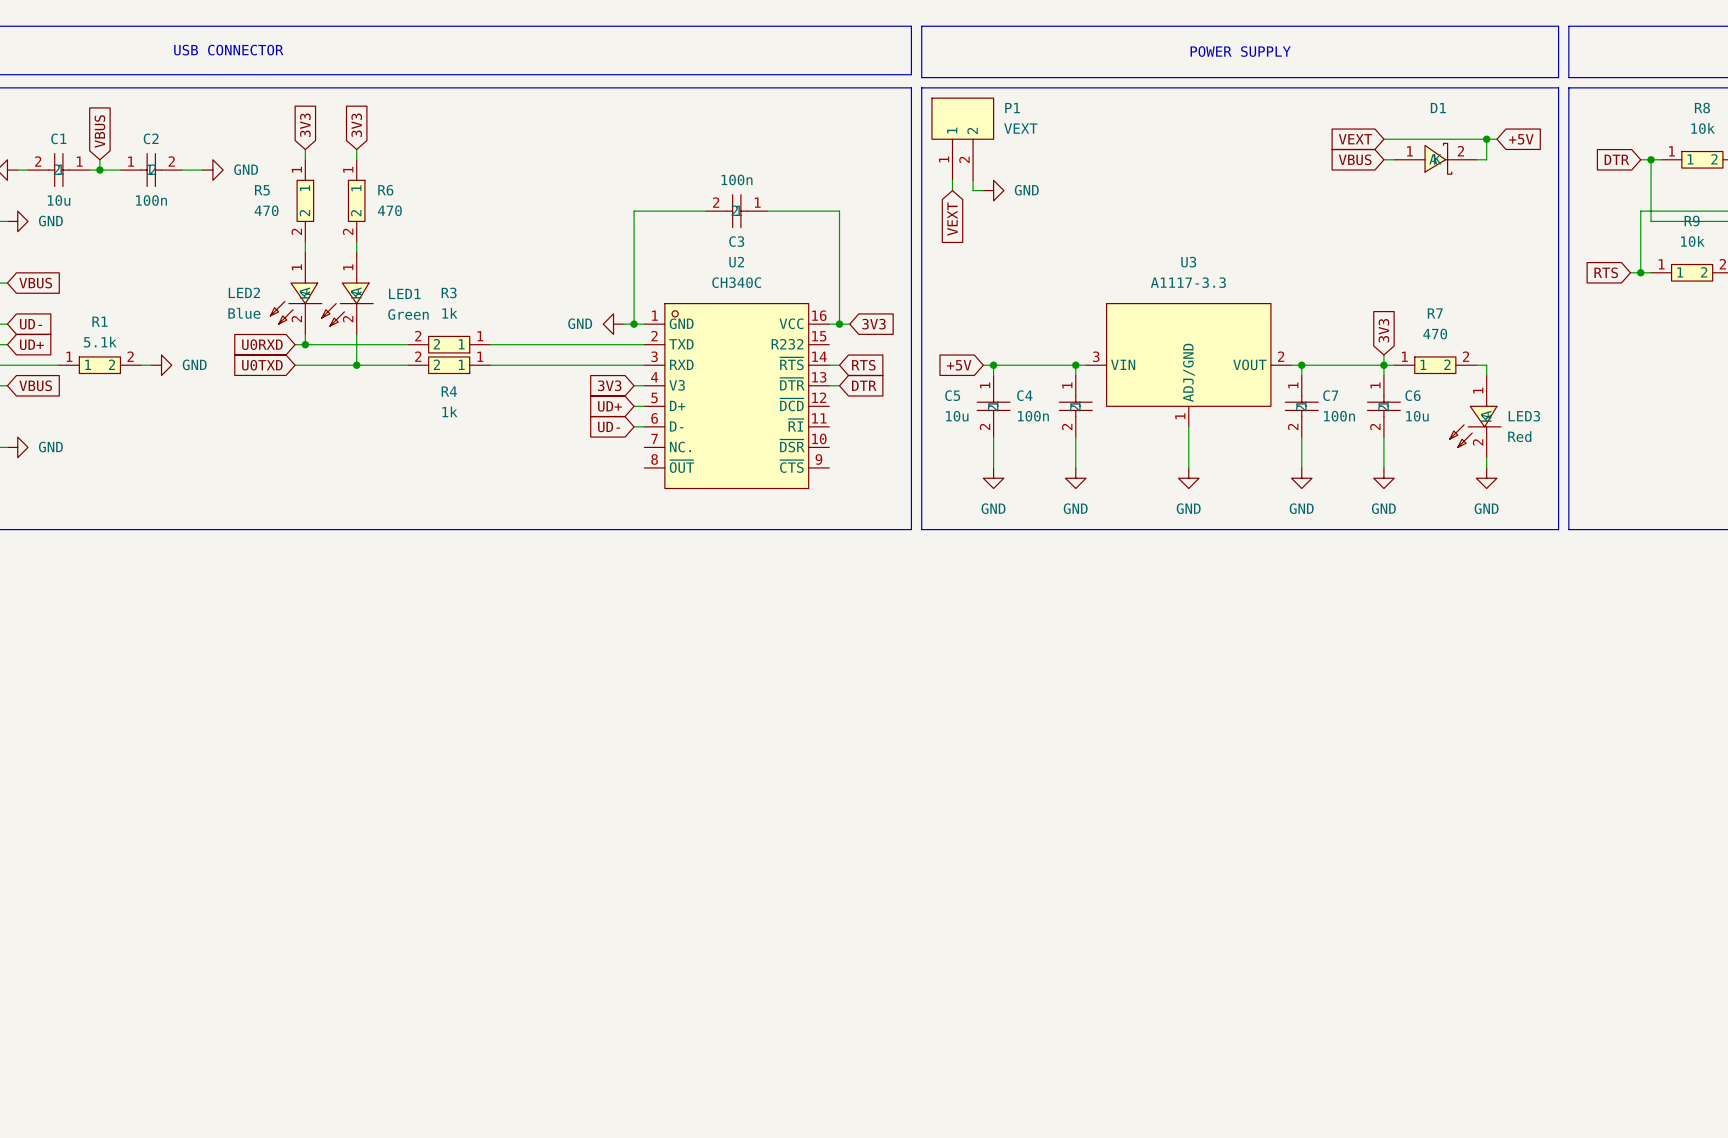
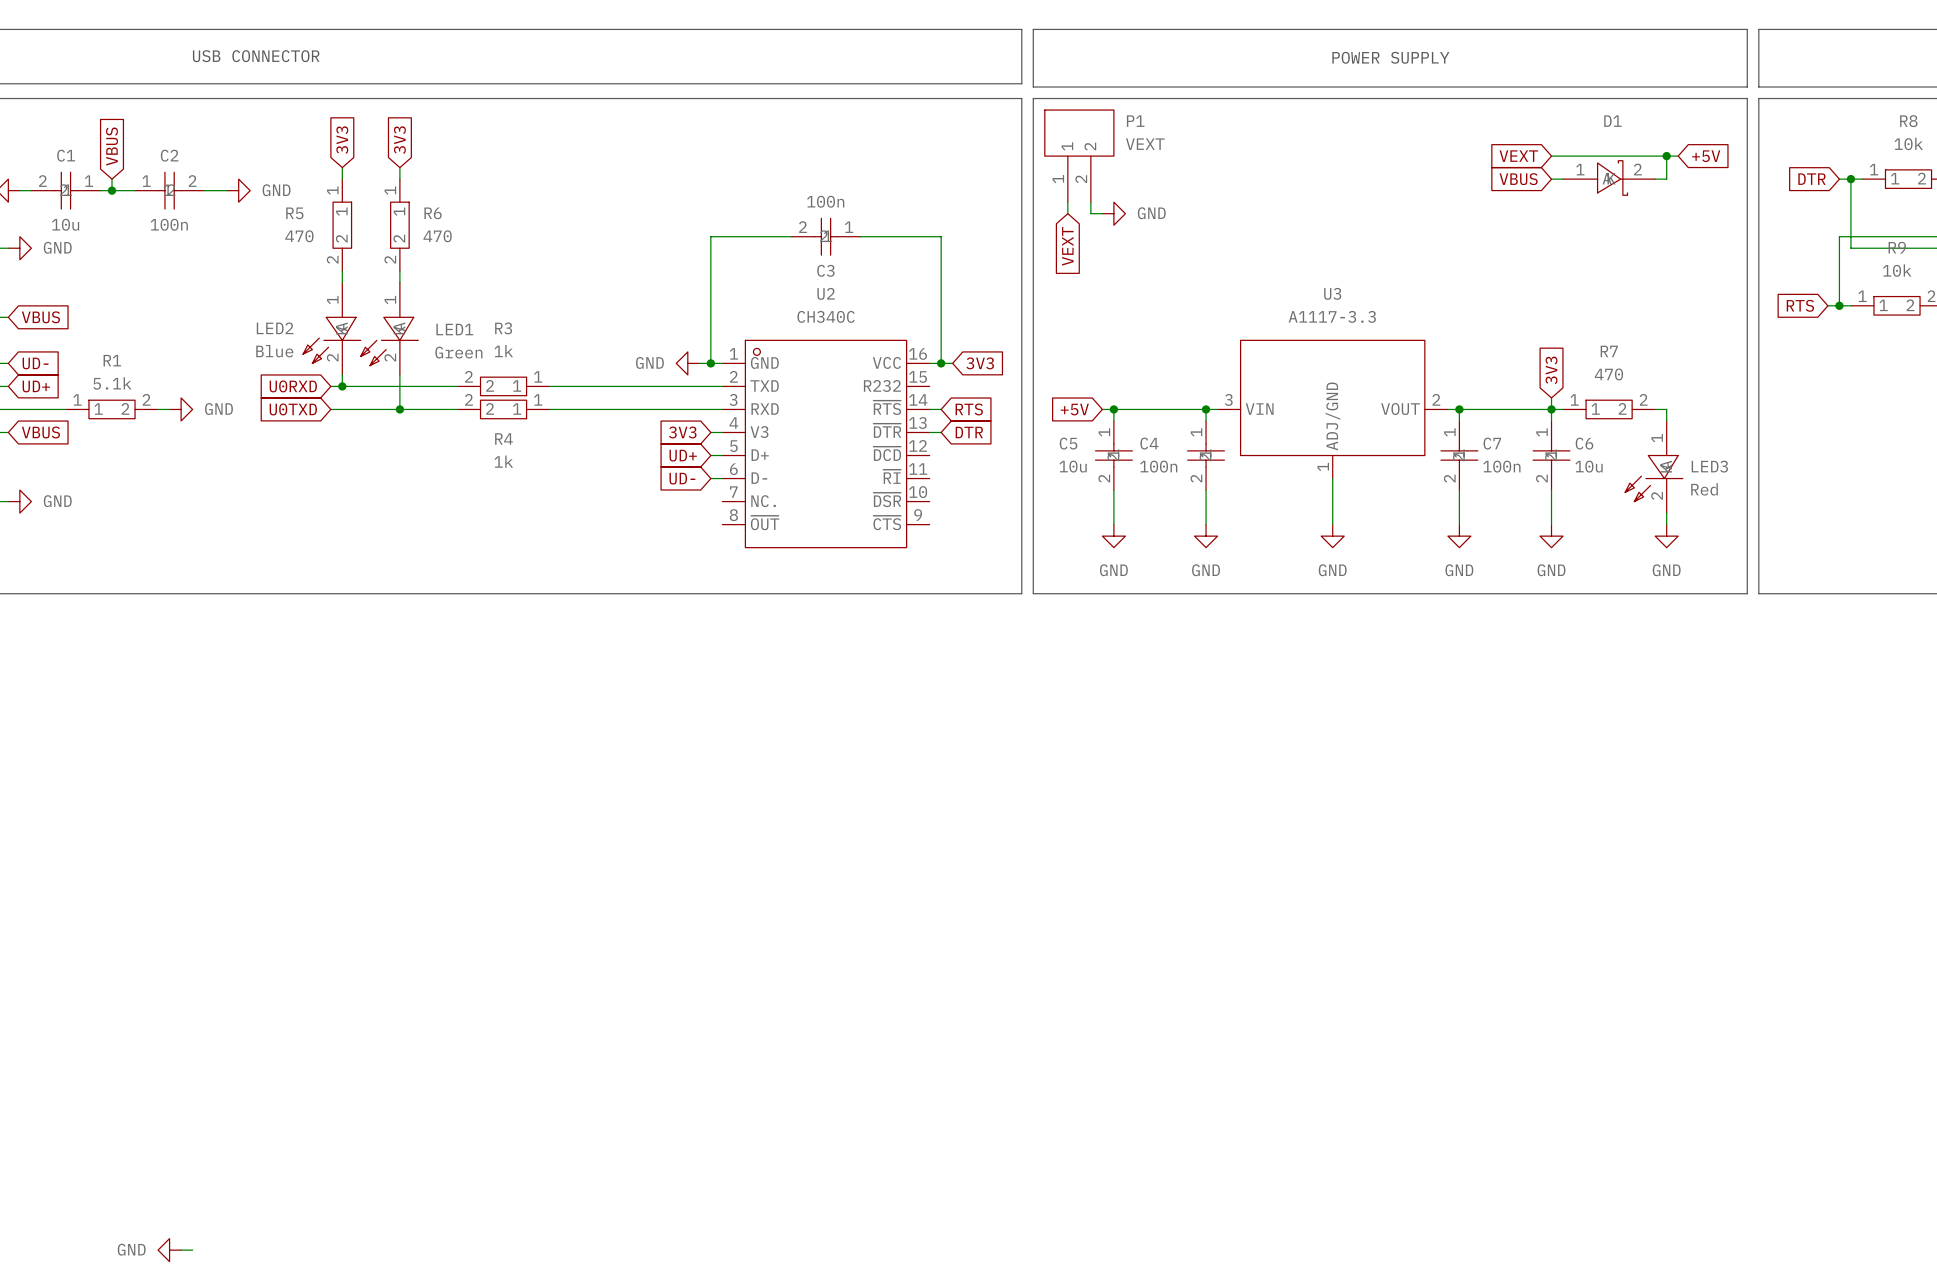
power symbol: none -> GND (169, 1250)
wire: none -> (181, 1250) (192, 1250)

